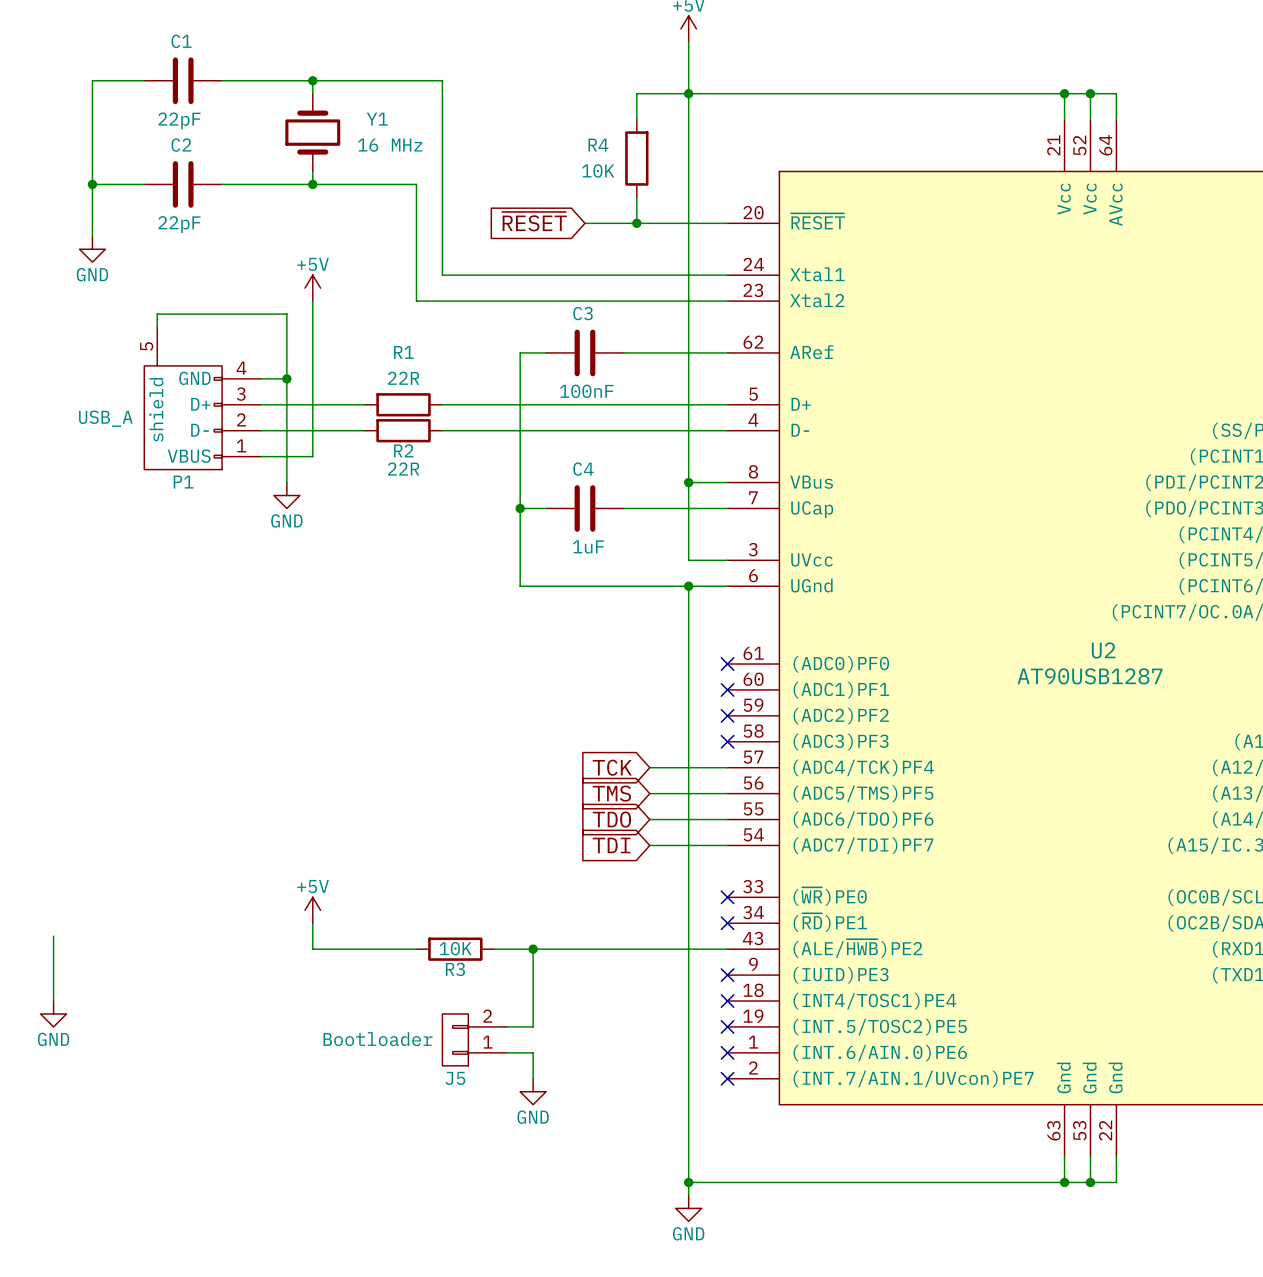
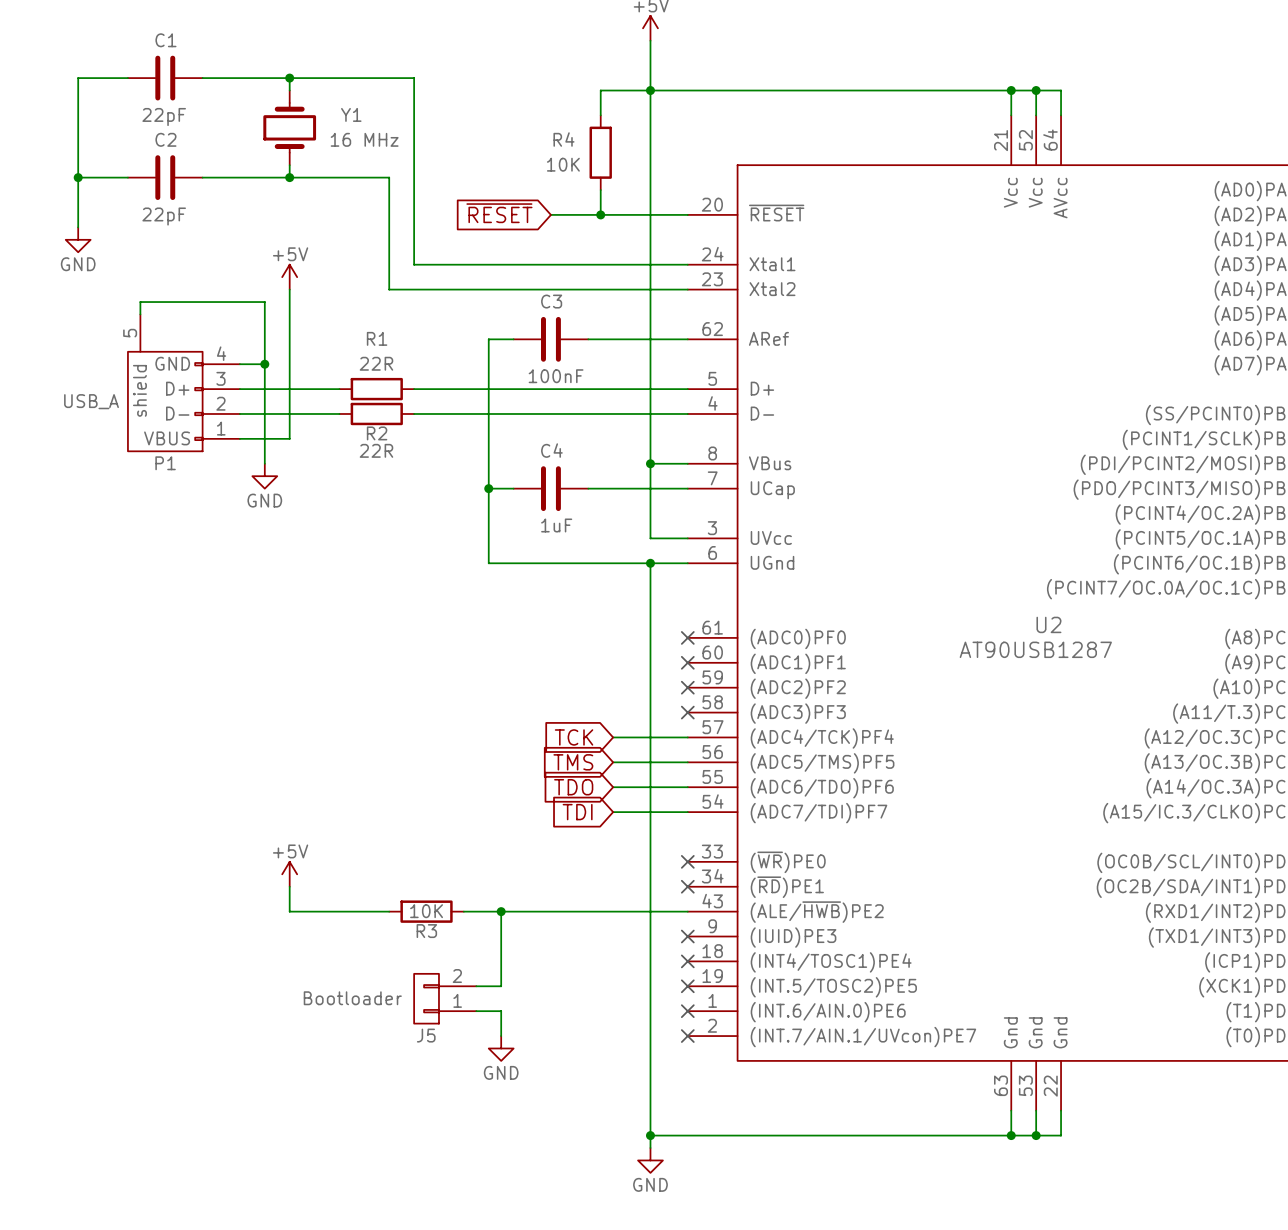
wire: (53, 936) (53, 1001) -> none
power symbol: GND (53, 1013) -> none

